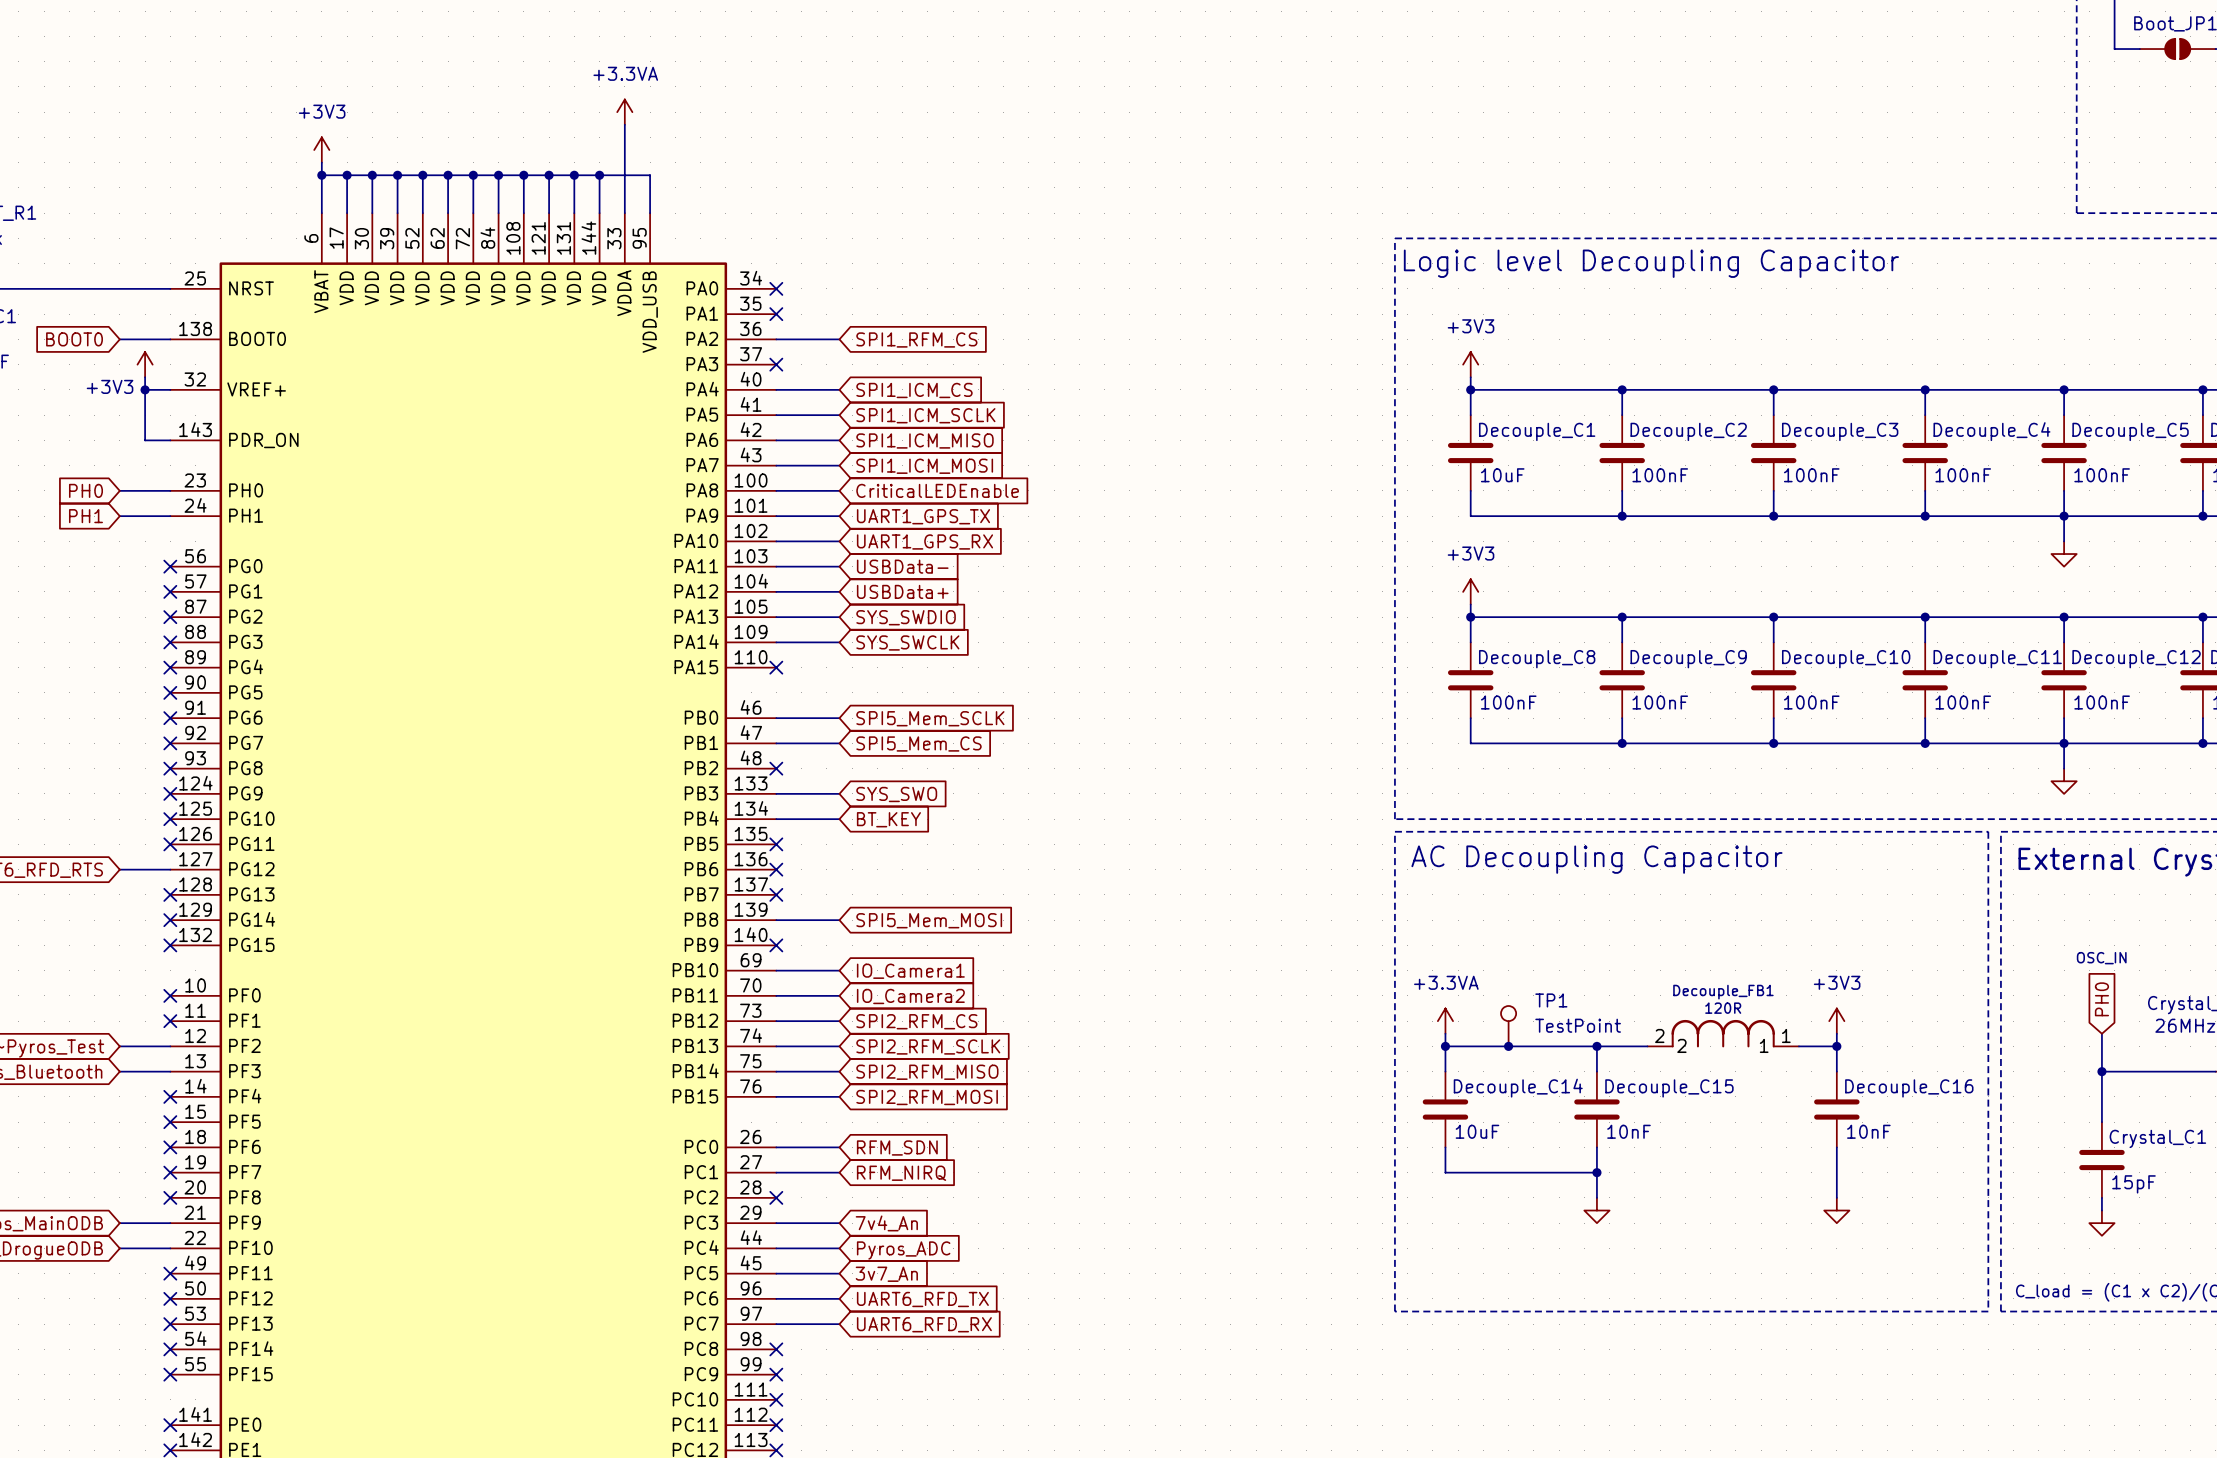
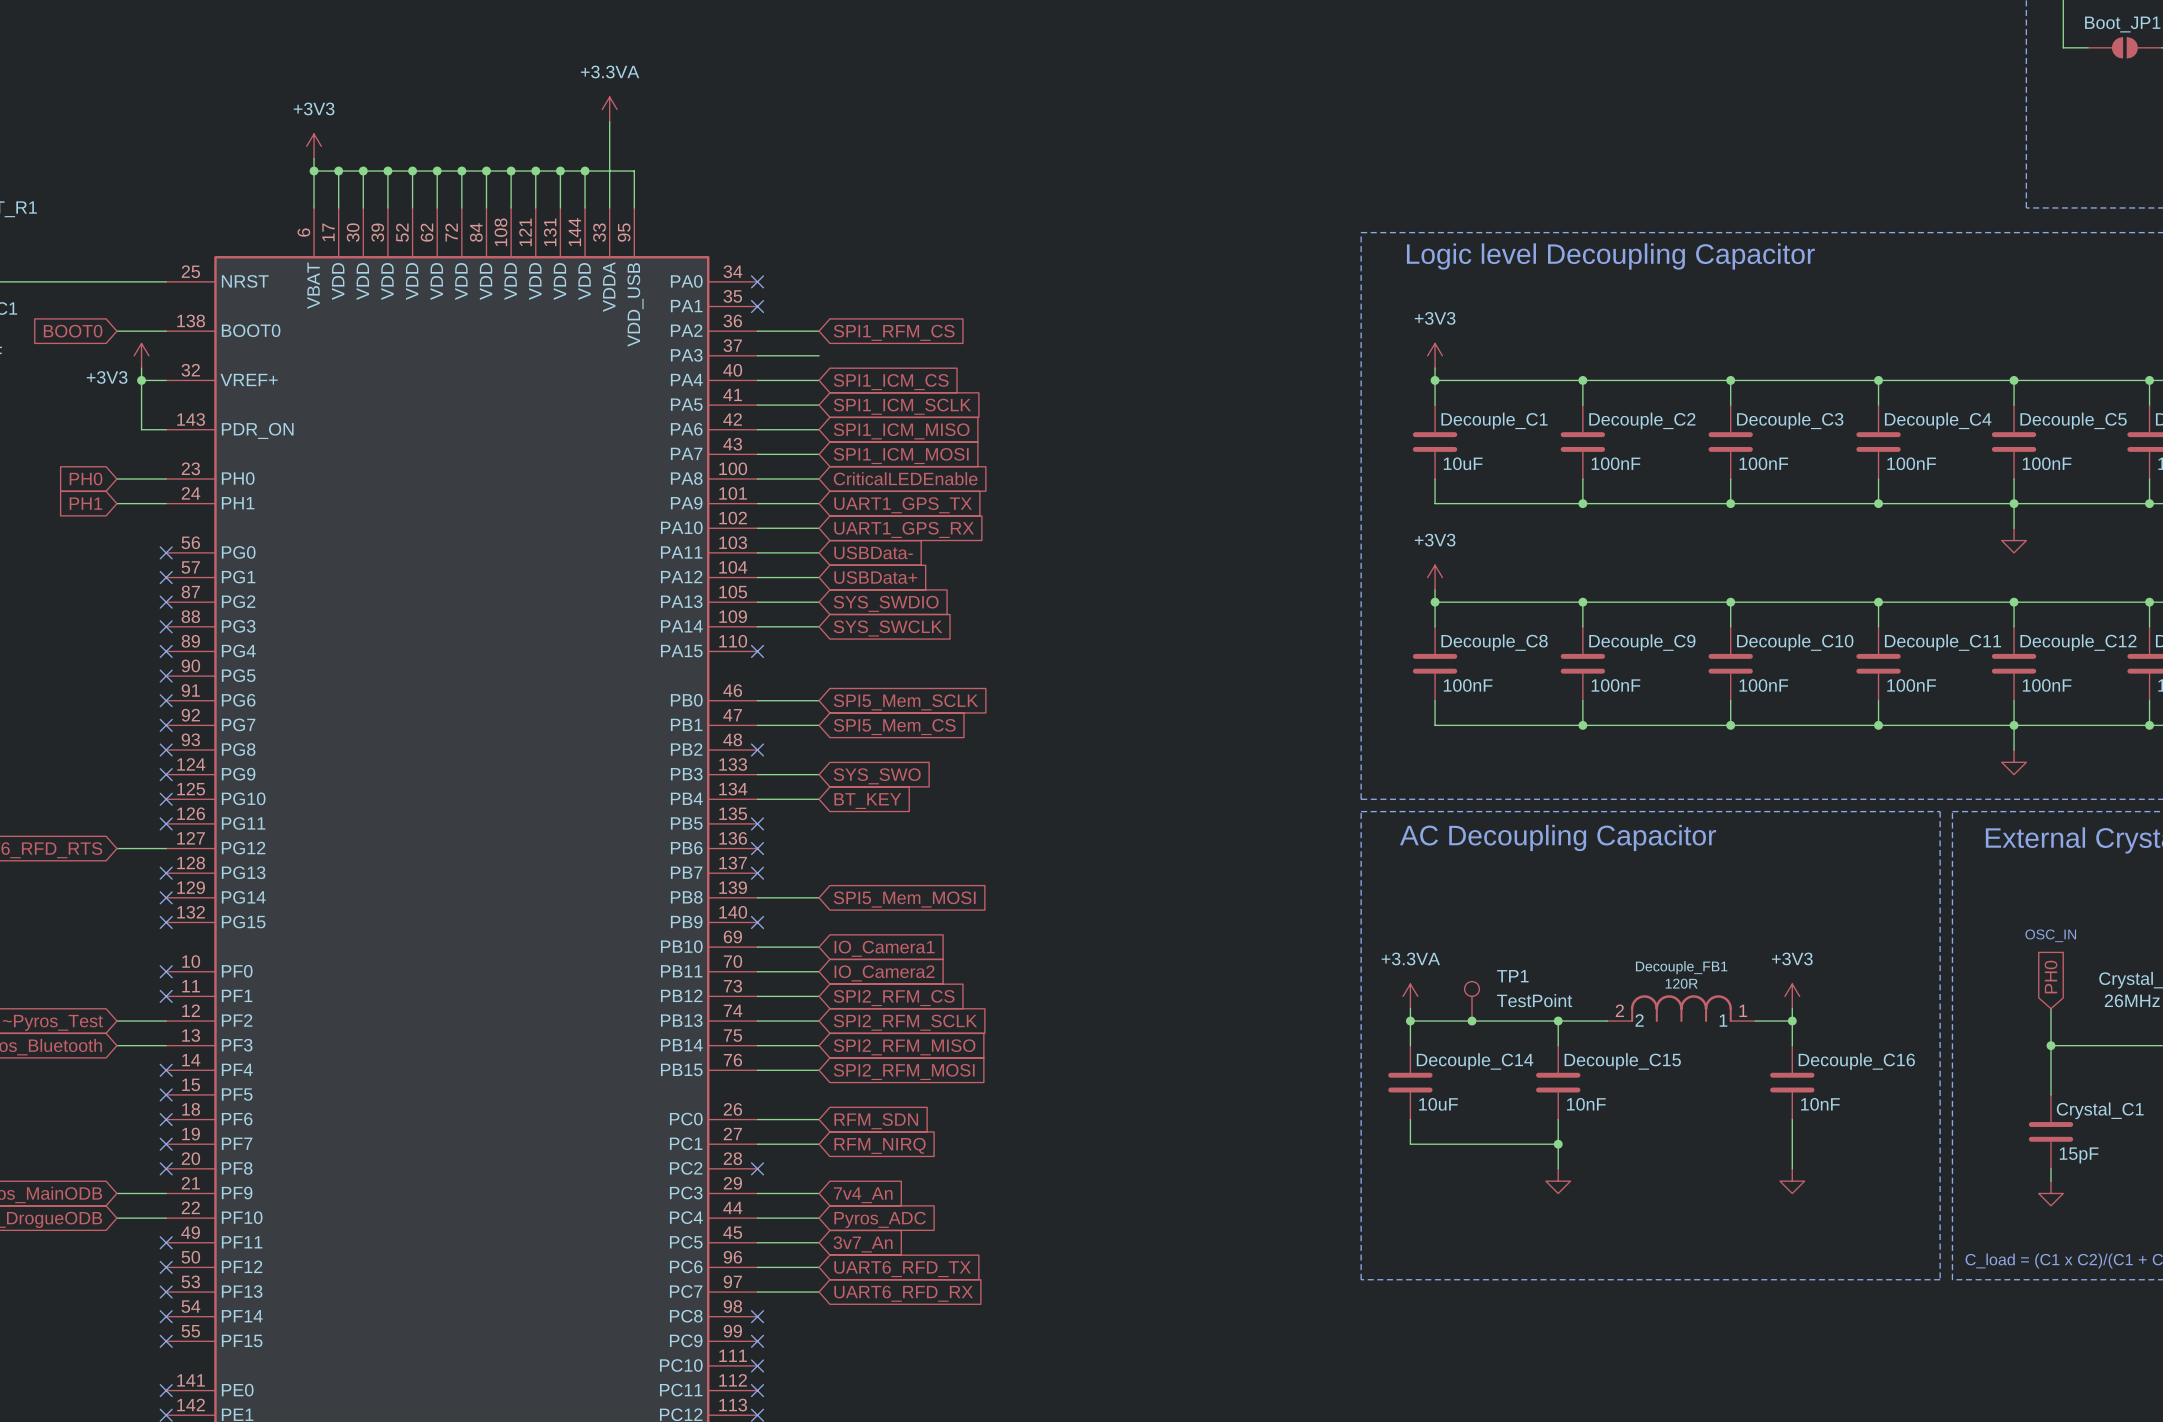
wire: none -> (757, 355) (819, 355)
no-connect mark: (776, 364) -> none

